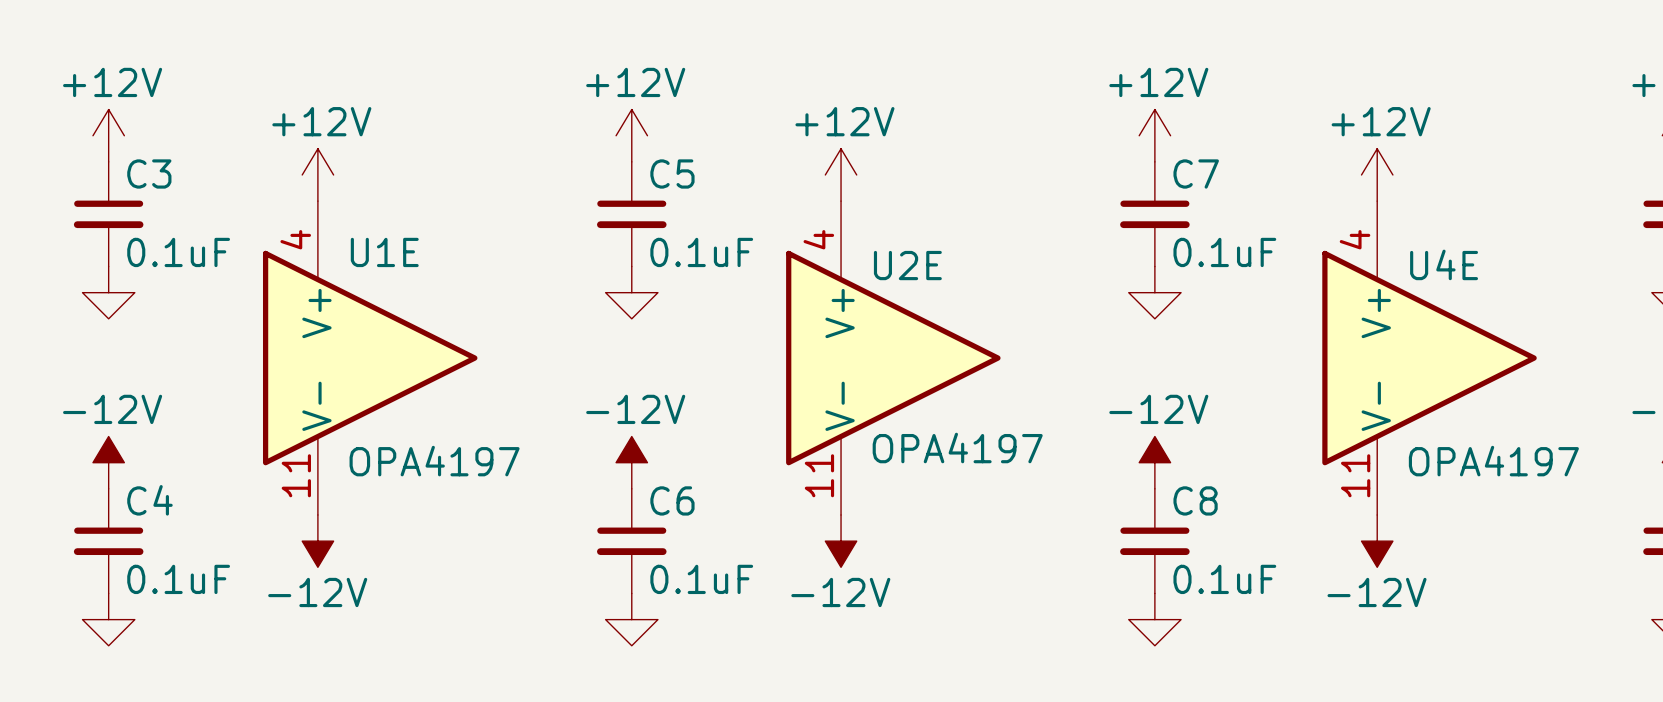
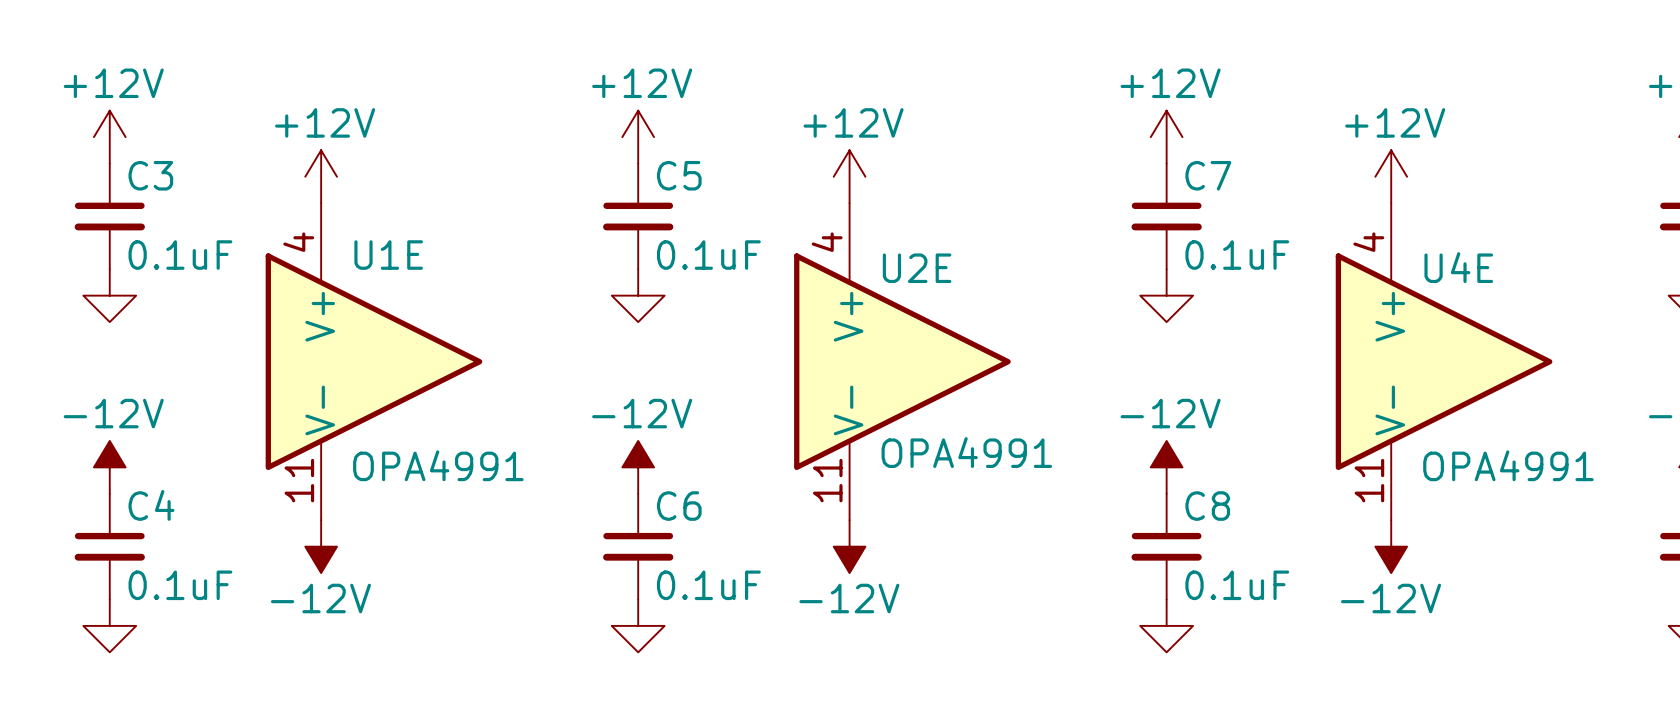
U2E value: OPA4197 (957, 448) -> OPA4991 (966, 452)
U1E value: OPA4197 (434, 461) -> OPA4991 (438, 465)
U4E value: OPA4197 (1493, 461) -> OPA4991 (1508, 465)

